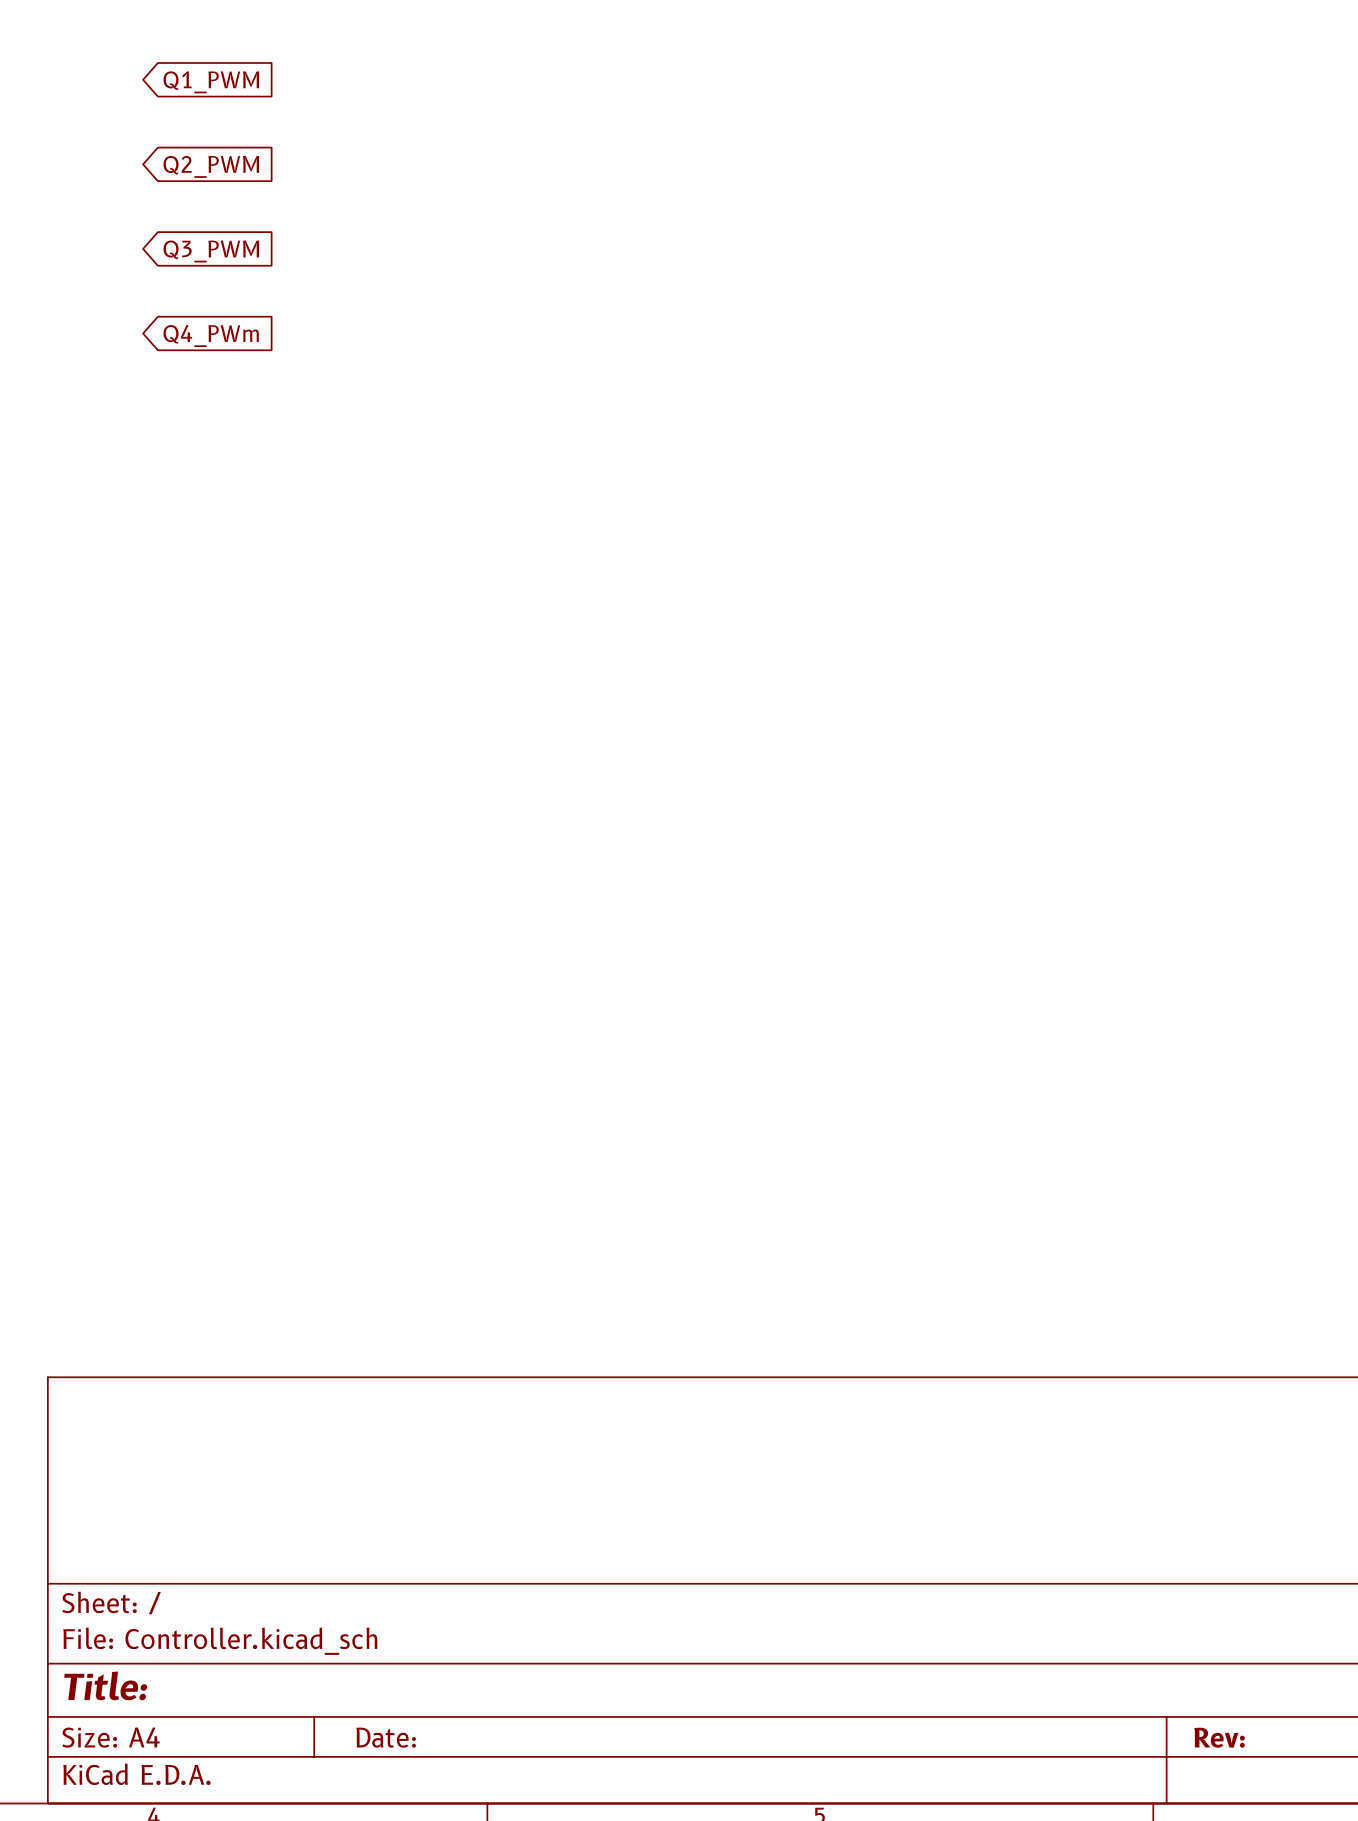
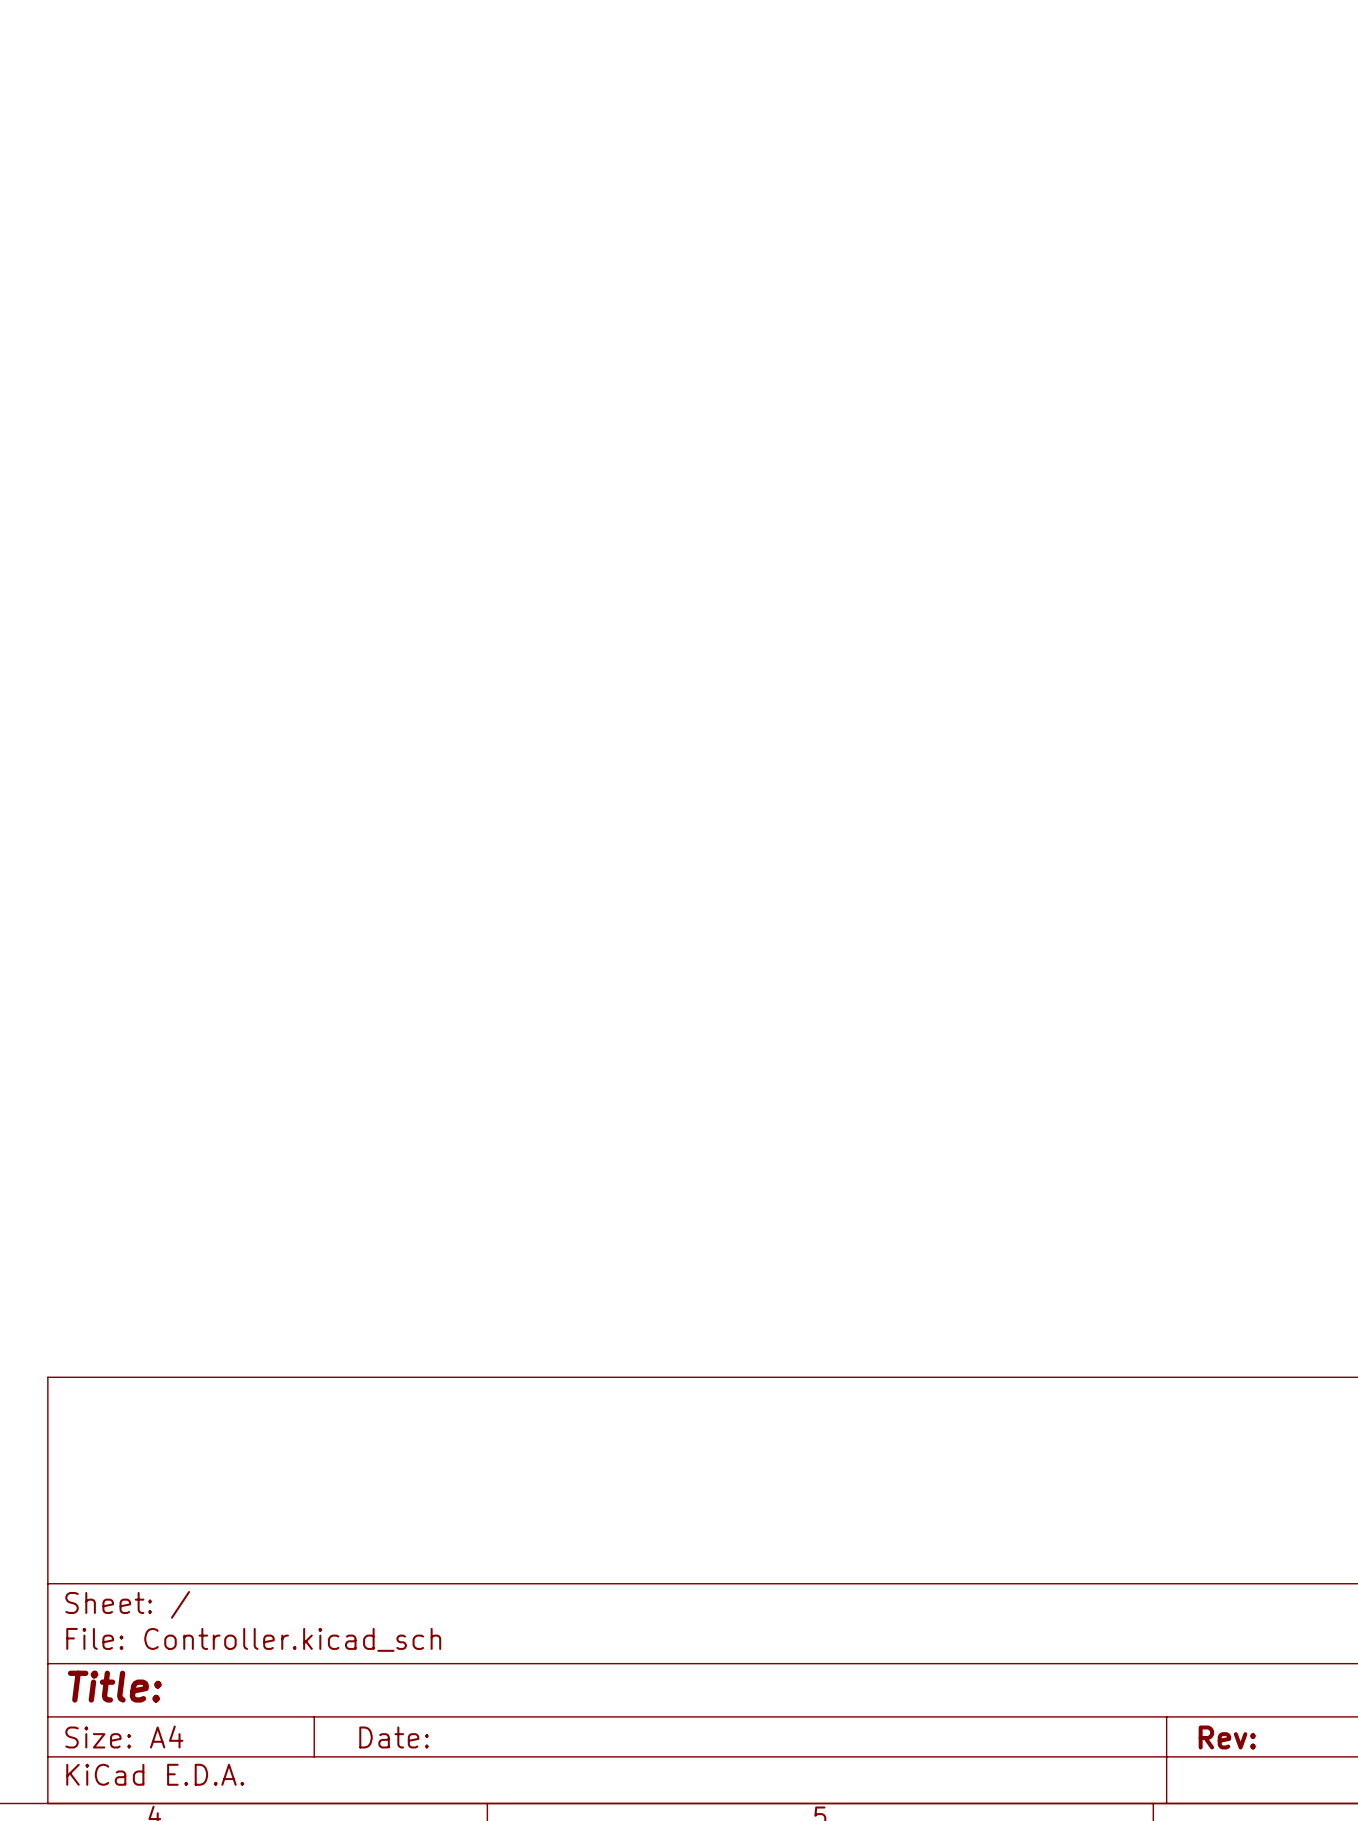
global label: Q1_PWM (211, 82) -> none
global label: Q2_PWM (211, 166) -> none
global label: Q3_PWM (211, 251) -> none
global label: Q4_PWm (211, 336) -> none

